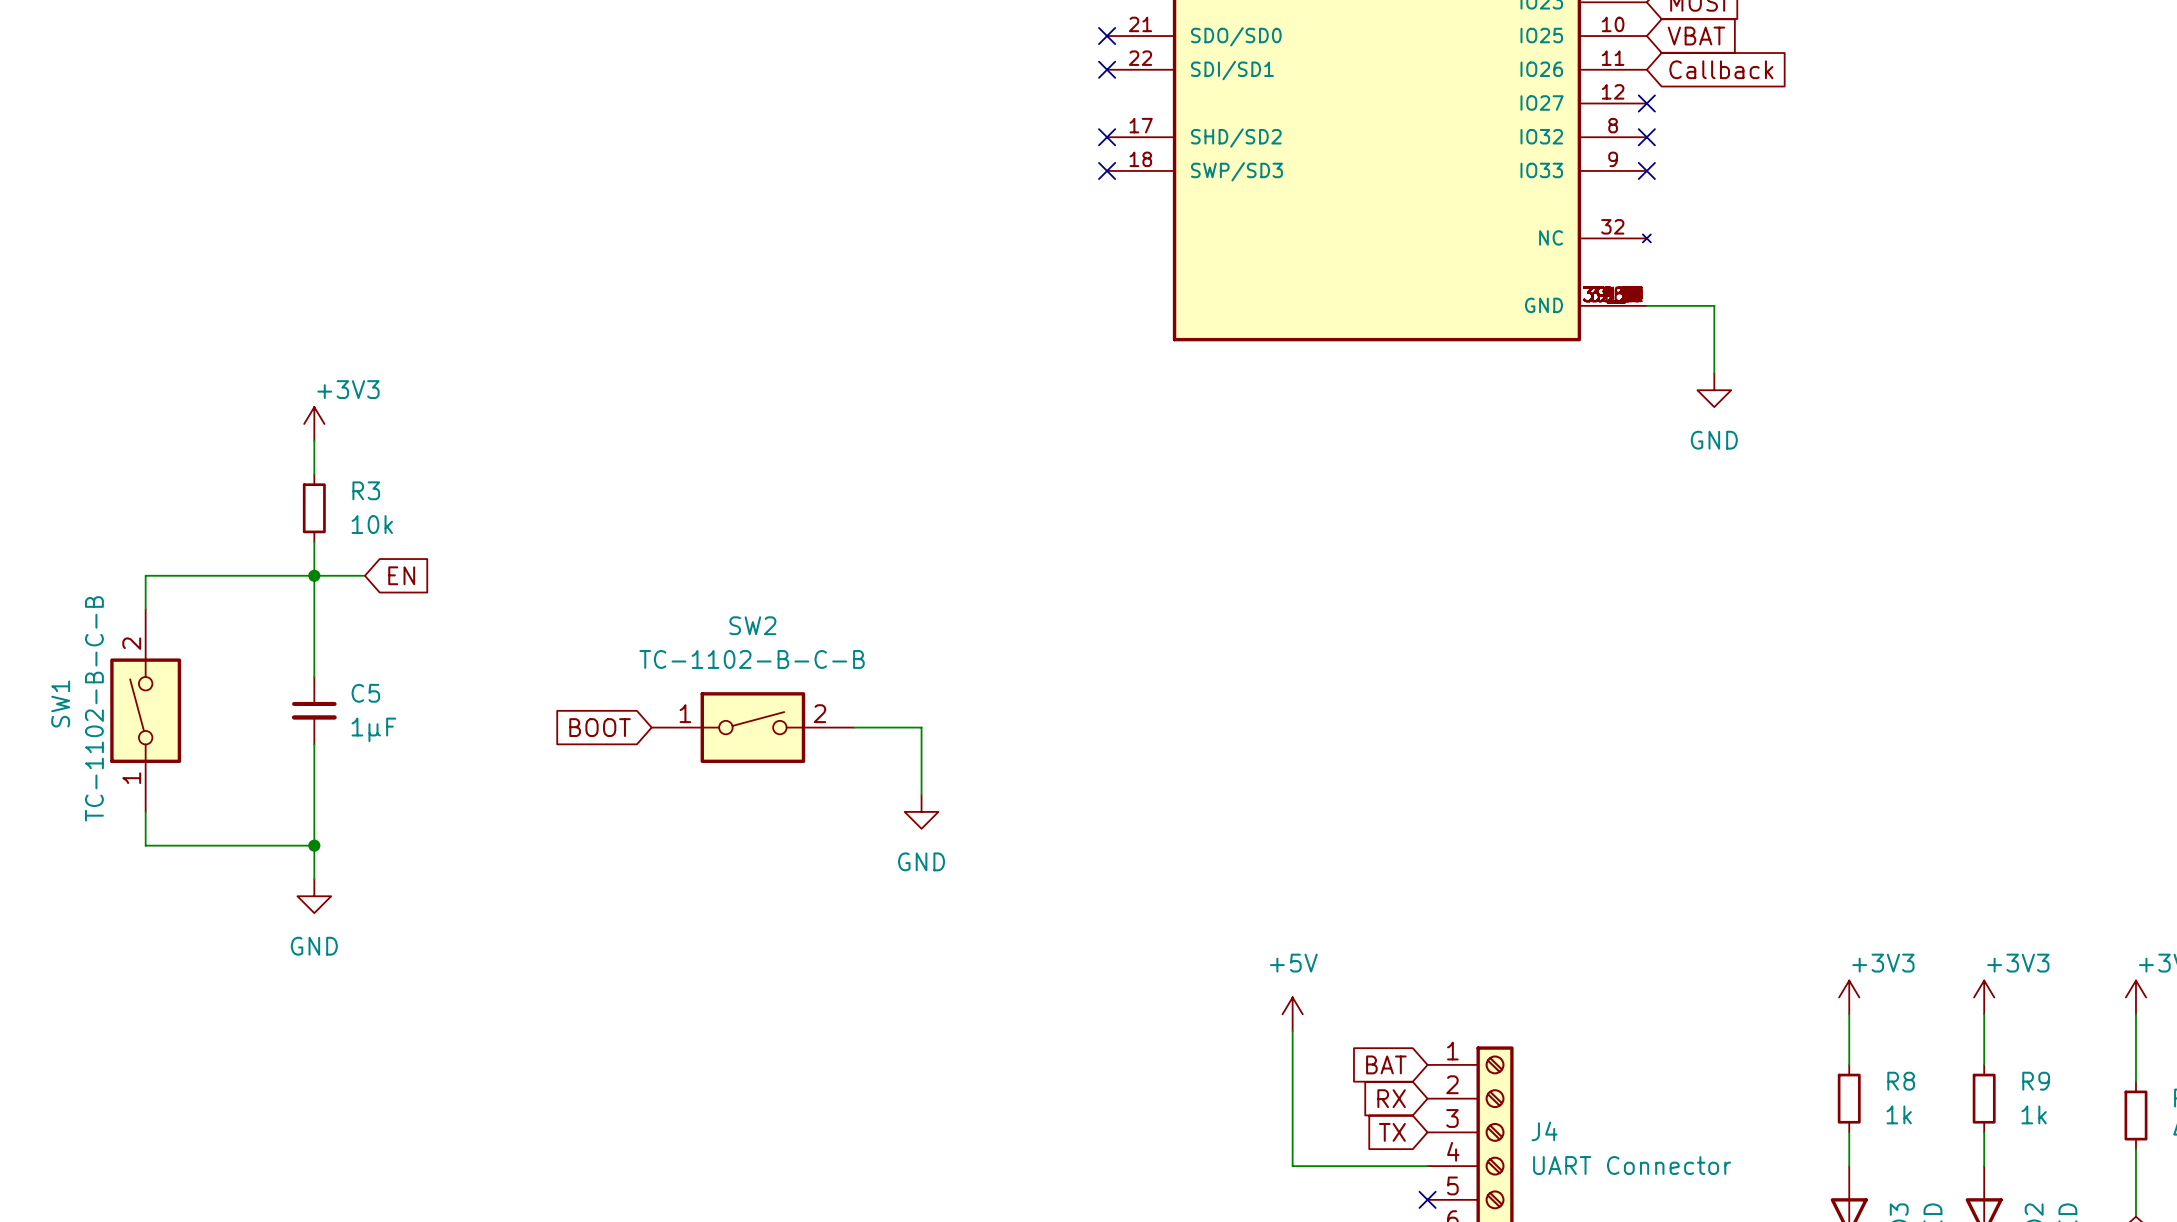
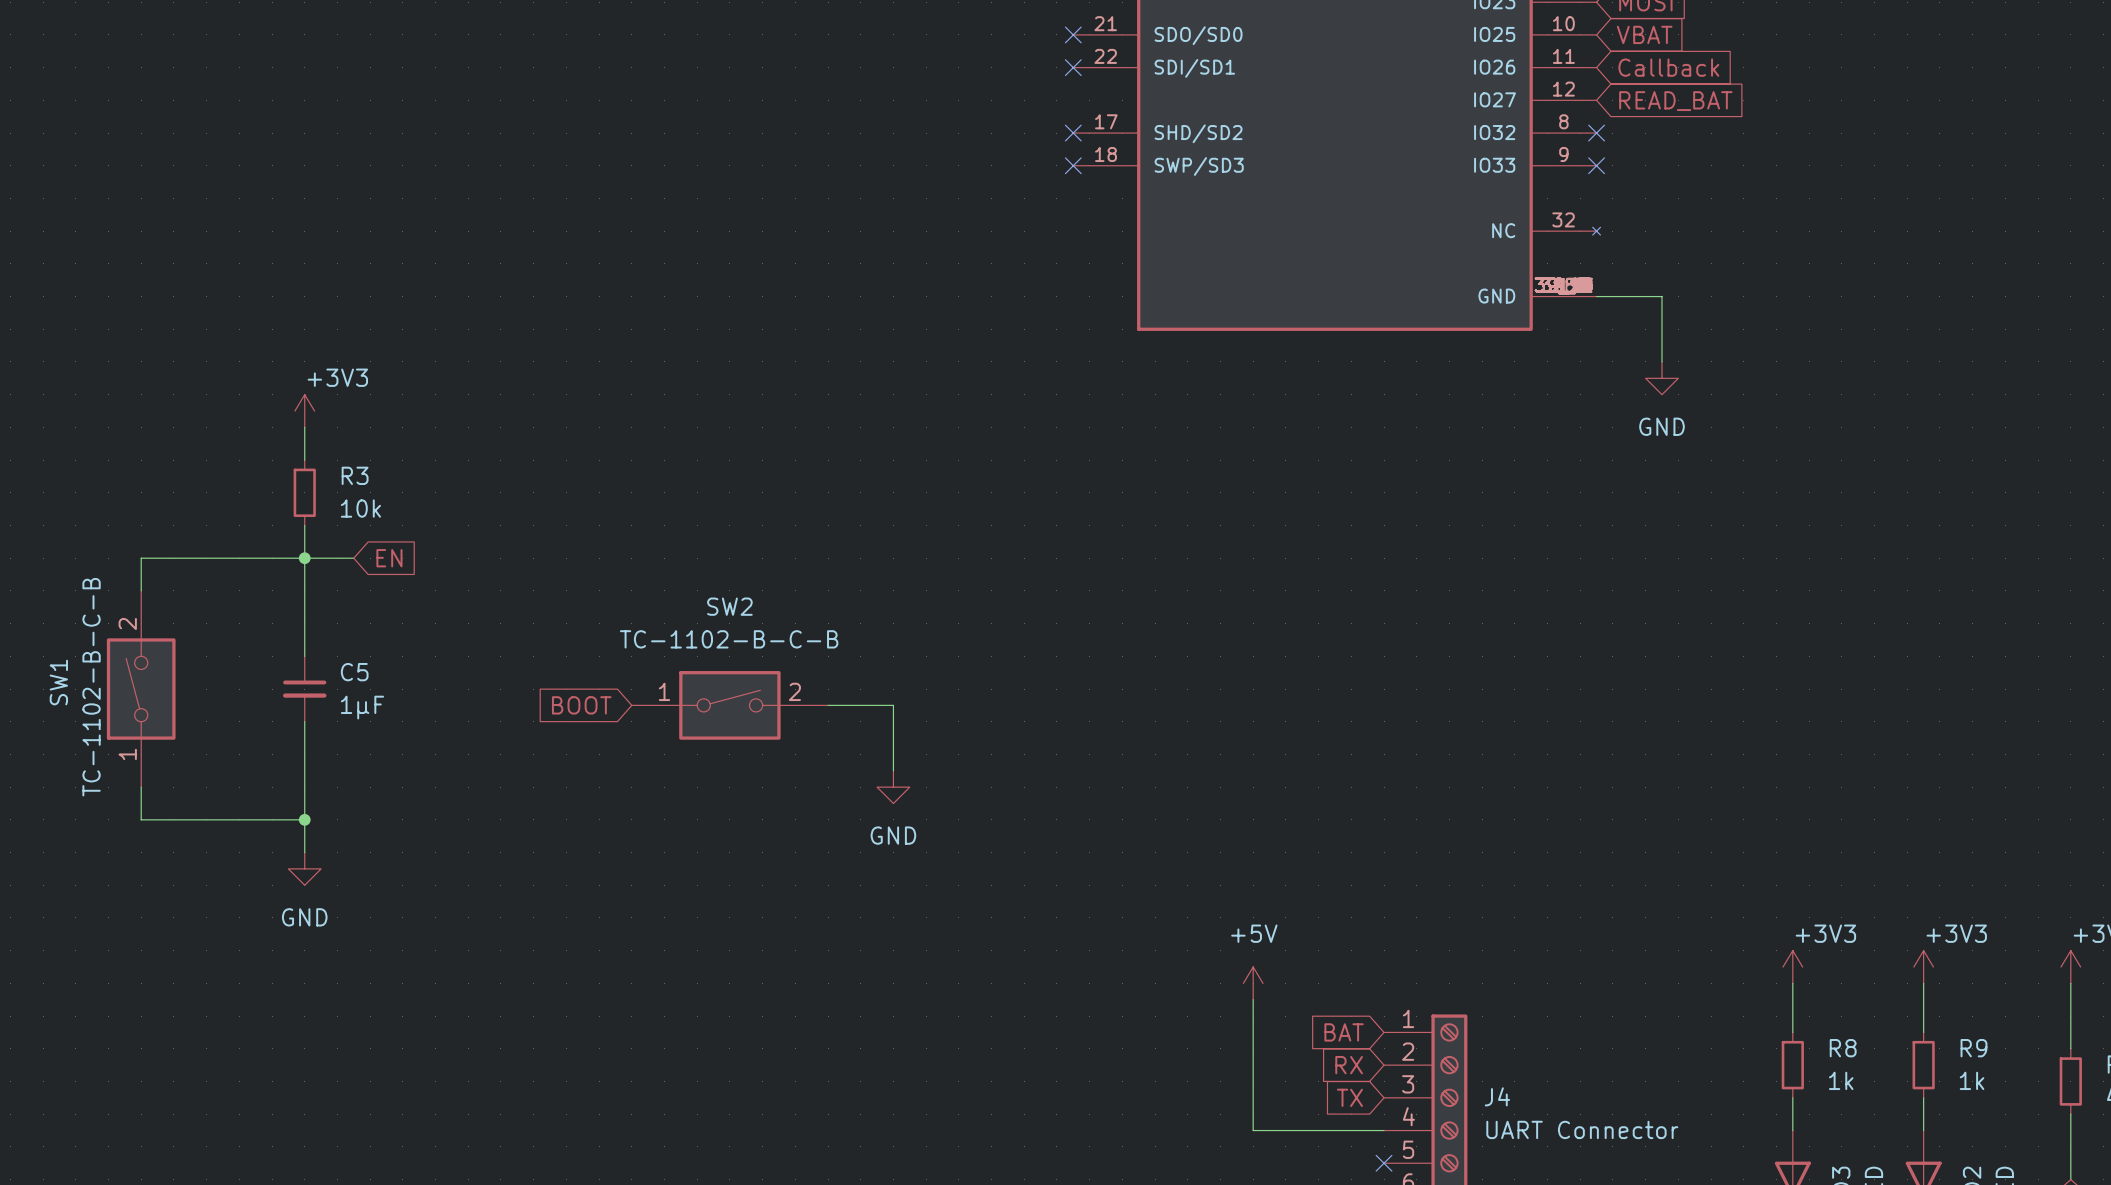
no-connect mark: (1646, 103) -> none
global label: none -> READ_BAT (1675, 101)

